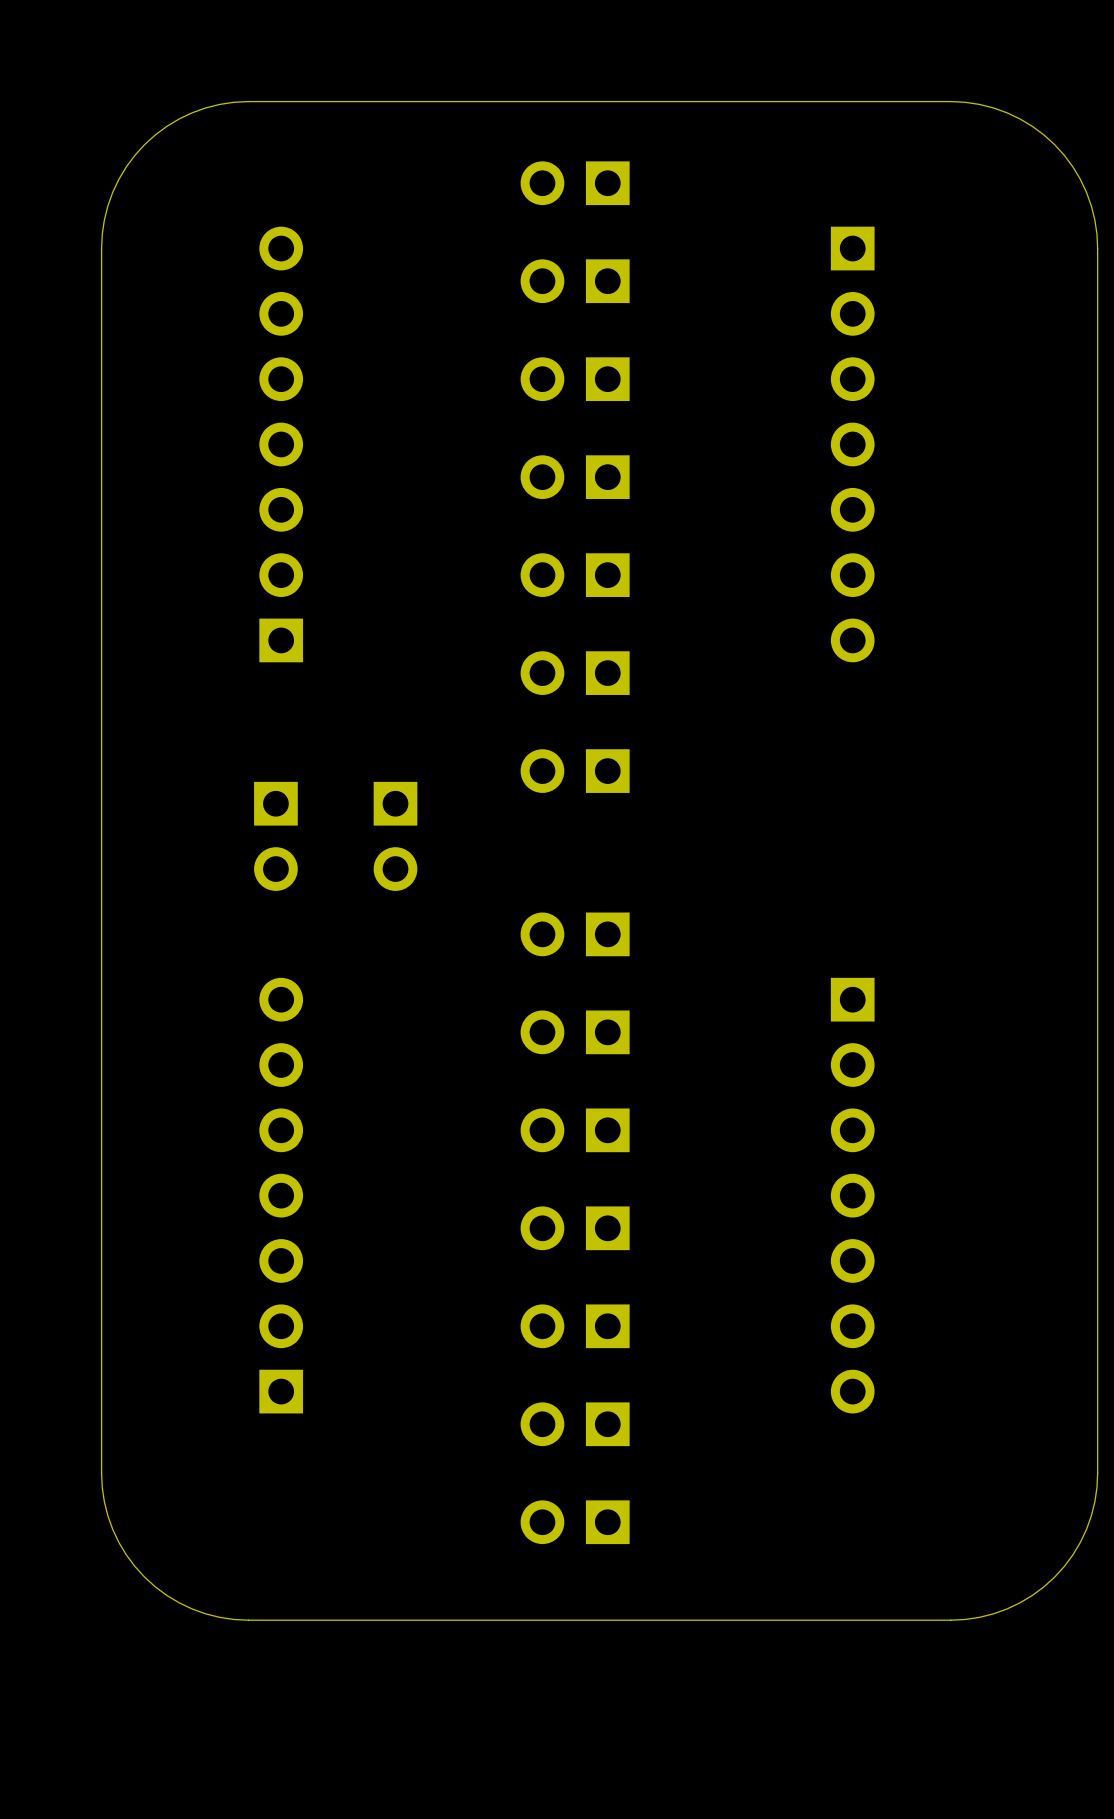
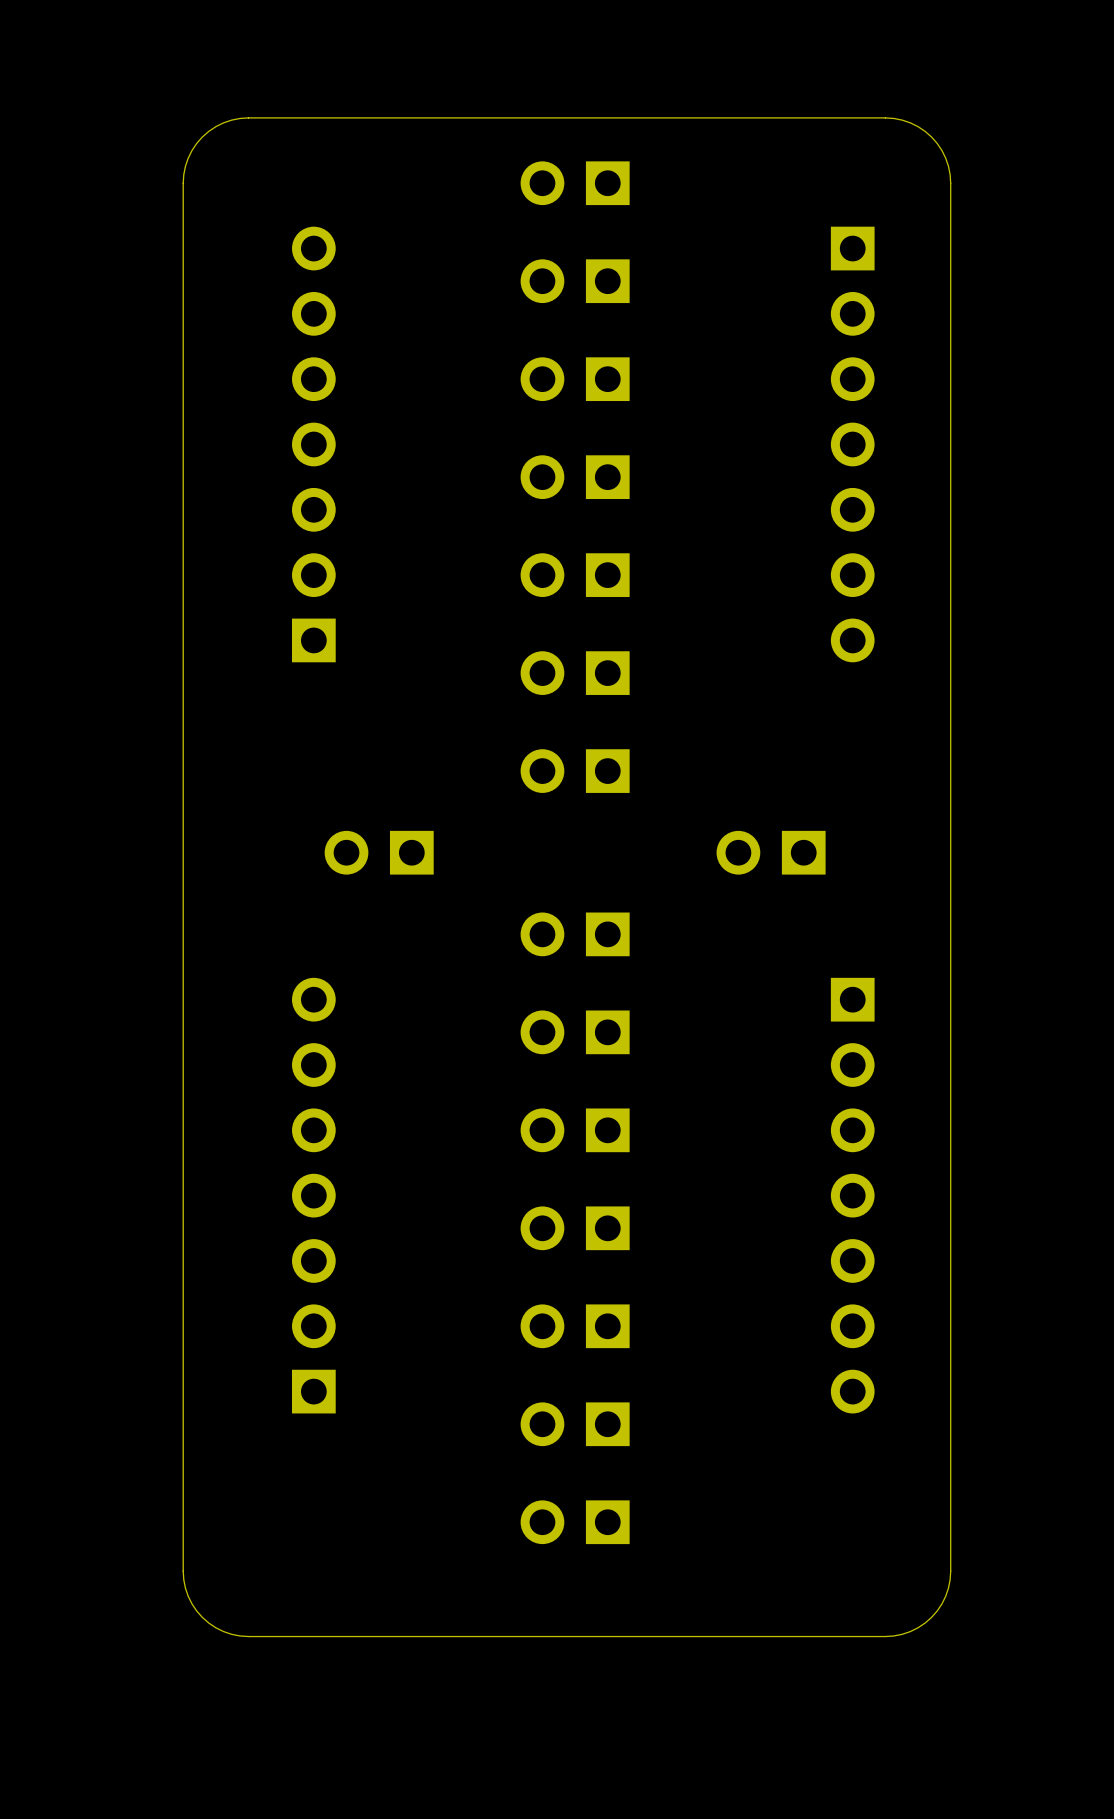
board edge: (950, 101) (234, 102) (192, 112) (166, 126) (134, 155) (118, 179) (107, 205) (101, 248) (101, 1473) (107, 1515) (118, 1542) (144, 1577) (179, 1602) (205, 1613) (248, 1620) (965, 1619) (993, 1613) (1032, 1595) (1054, 1577) (1080, 1542) (1091, 1515) (1097, 1473) (1096, 234) (1091, 205) (1080, 179) (1064, 155) (1043, 134) (1019, 118) (993, 107) (950, 101) -> (885, 117) (910, 122) (931, 137) (945, 158) (950, 183) (950, 1571) (945, 1596) (937, 1610) (925, 1623) (902, 1634) (885, 1636) (248, 1636) (223, 1631) (208, 1623) (196, 1610) (185, 1588) (183, 1571) (183, 183) (188, 158) (202, 137) (215, 126) (231, 120) (248, 117) (885, 117)
part position: (281, 444) -> (313, 444)
part rotation: 0° (275, 836) -> 90° clockwise (771, 852)
part position: (275, 836) -> (771, 852)
part rotation: 0° (395, 836) -> 90° clockwise (379, 852)
part position: (281, 1195) -> (313, 1195)

